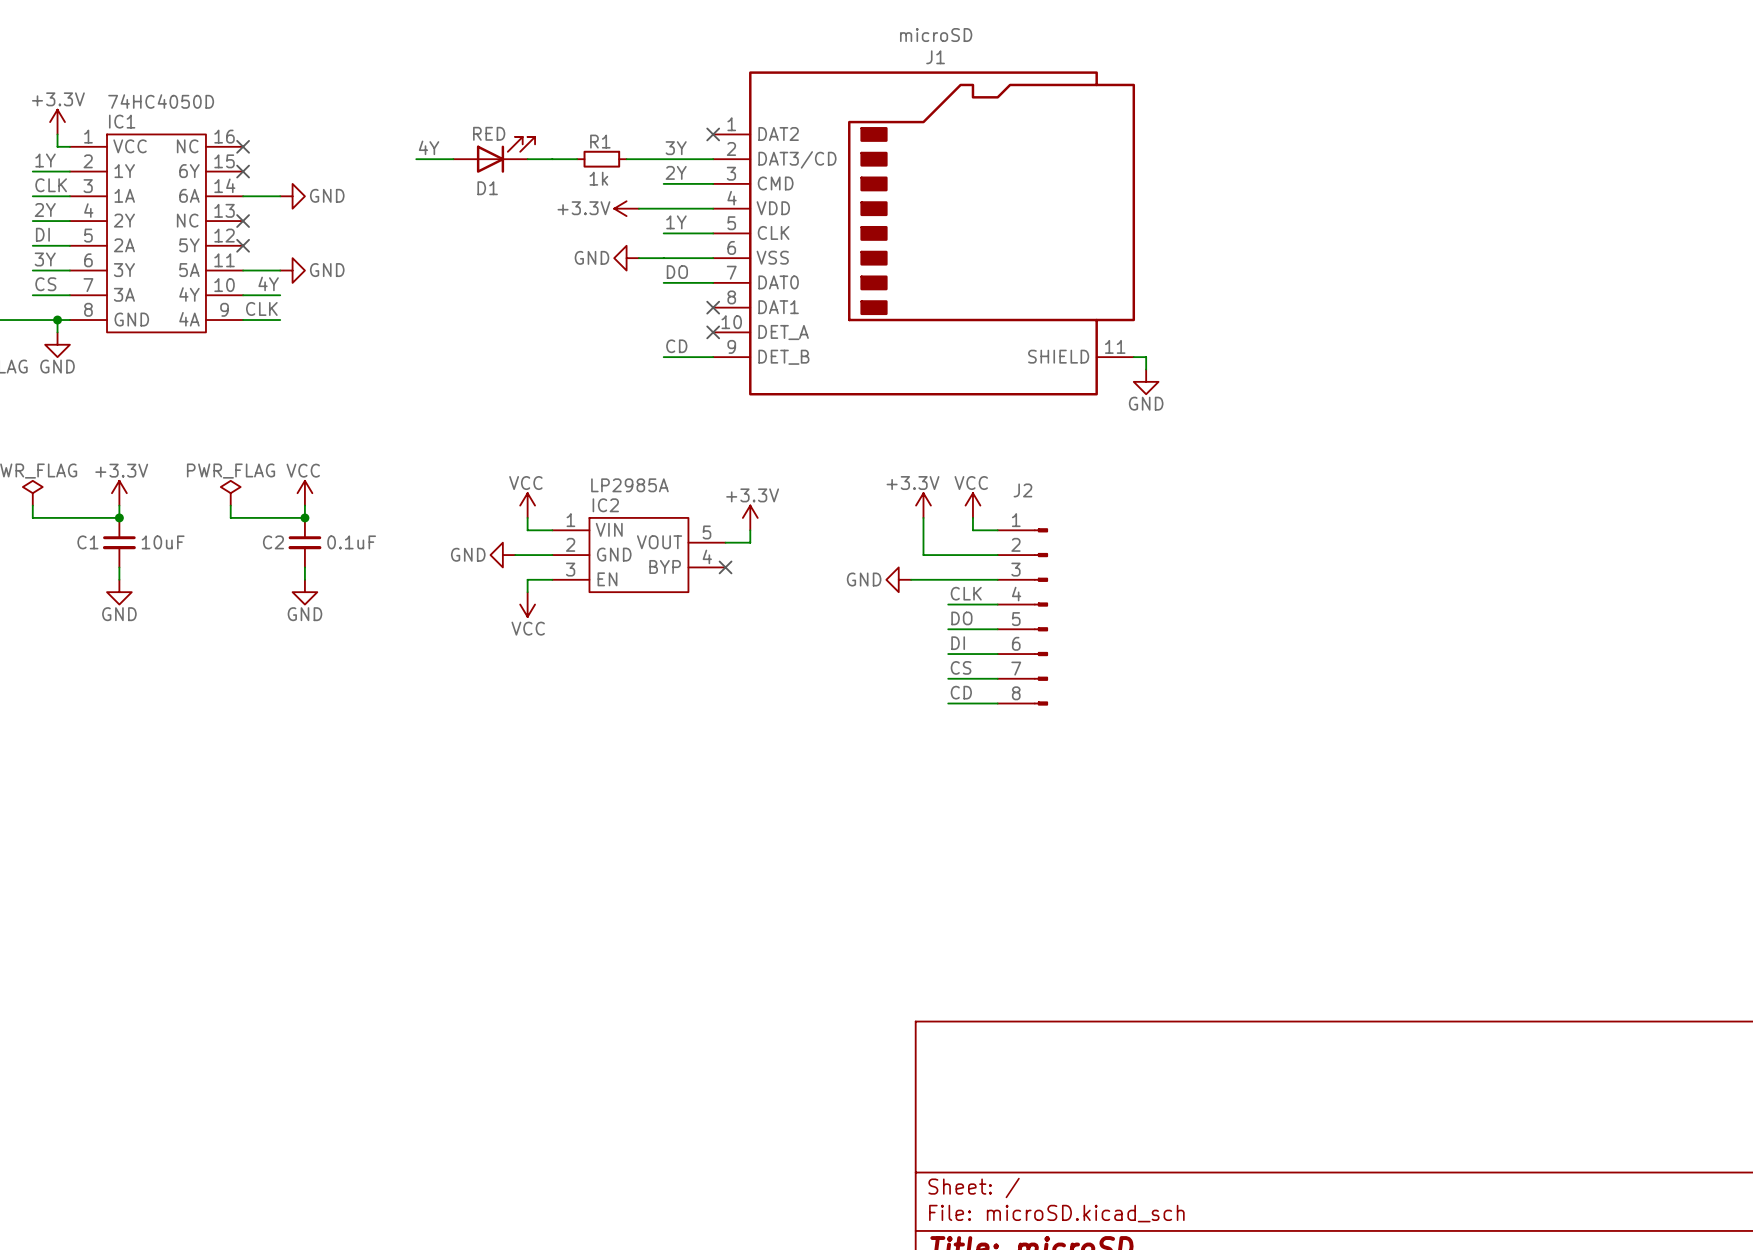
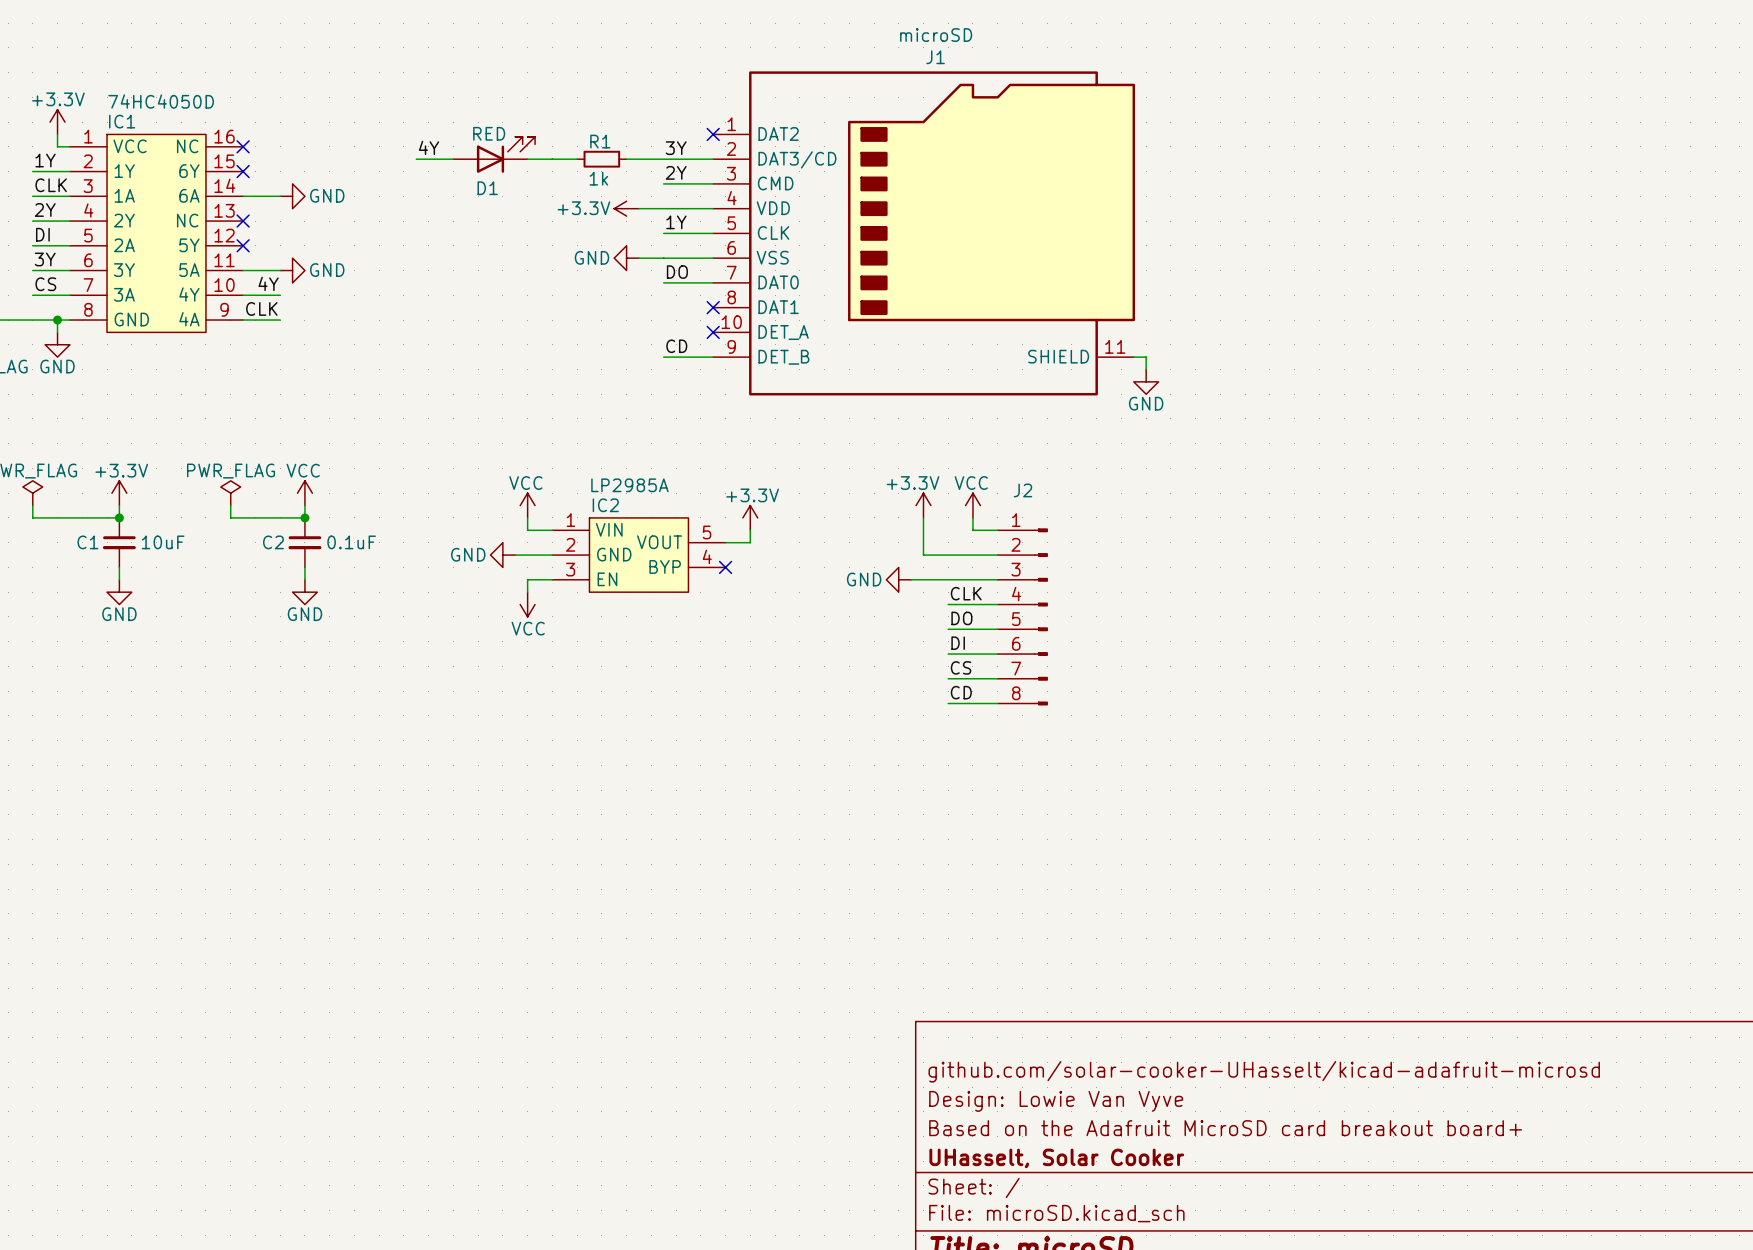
title block: none -> github.com/solar-cooker-UHasselt/kicad-adafruit-microsd (1264, 1071)
title block: none -> Design: Lowie Van Vyve (1056, 1101)
title block: none -> Based on the Adafruit MicroSD card breakout board+ (1225, 1128)
title block: none -> UHasselt, Solar Cooker (1056, 1158)

